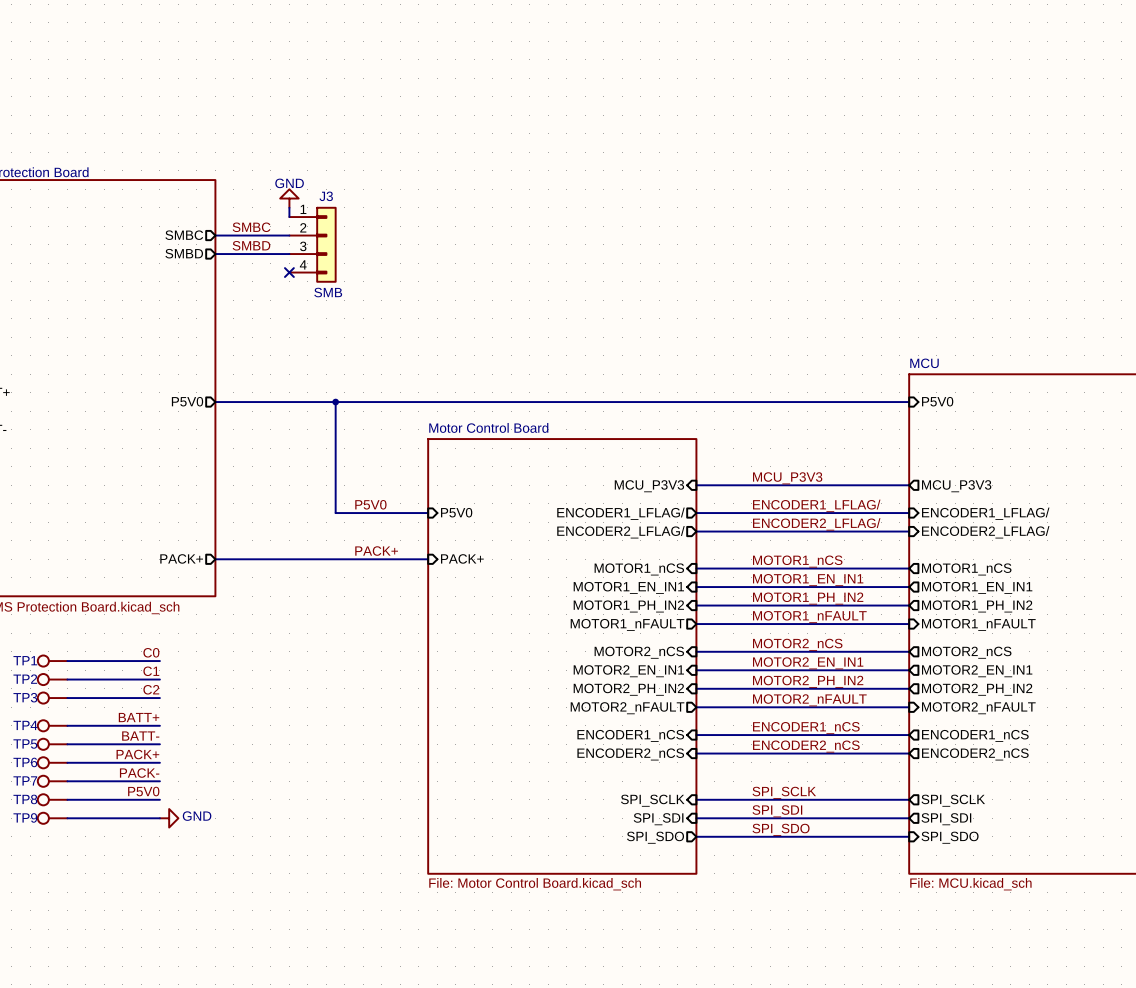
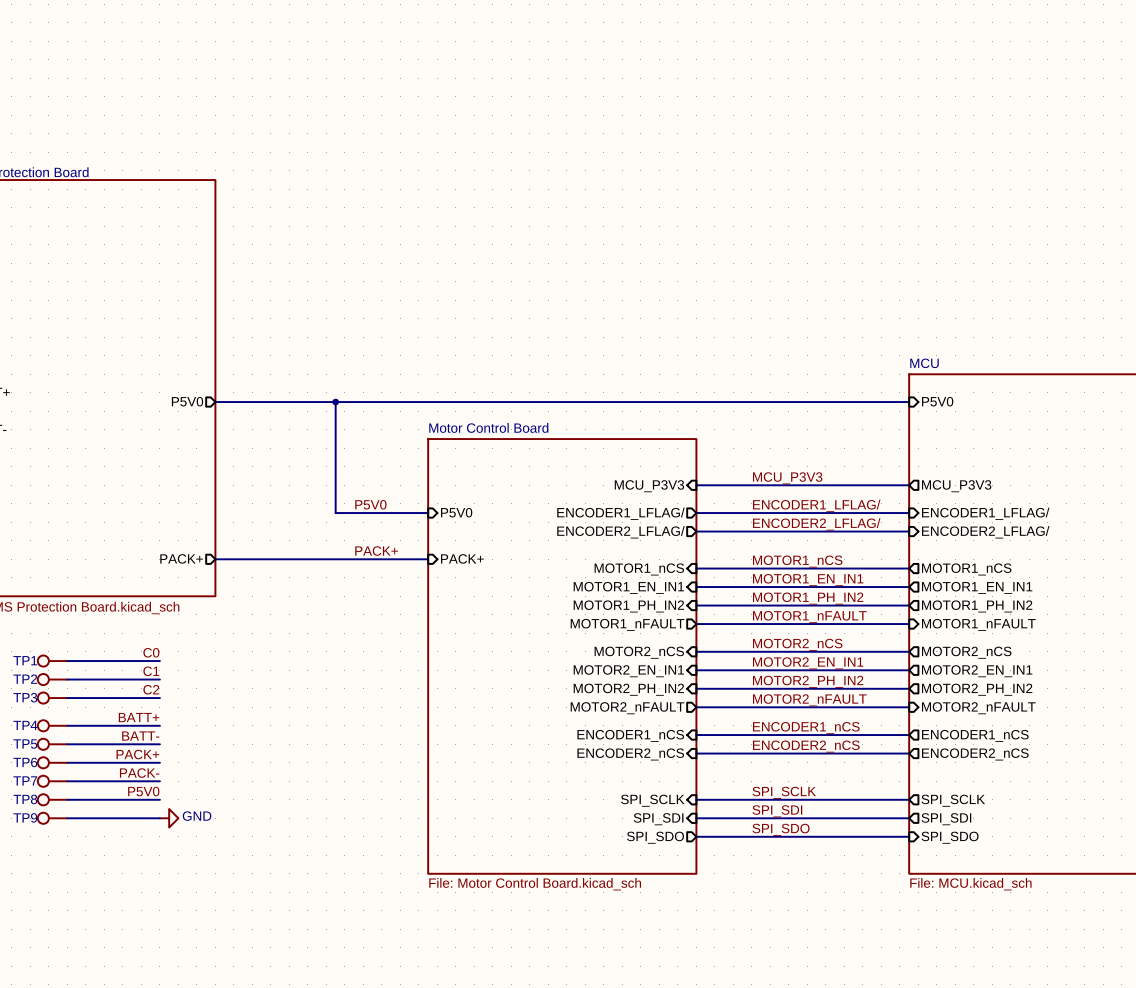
power symbol: GND (289, 198) -> none
wire: (289, 207) (289, 217) -> none
label: SMBC (251, 227) -> none
sheet pin: SMBC (184, 235) -> none
wire: (215, 235) (289, 235) -> none
J3: SMB (313, 244) -> none
label: SMBD (251, 245) -> none
sheet pin: SMBD (184, 253) -> none
wire: (215, 254) (289, 254) -> none
no-connect mark: (289, 272) -> none

